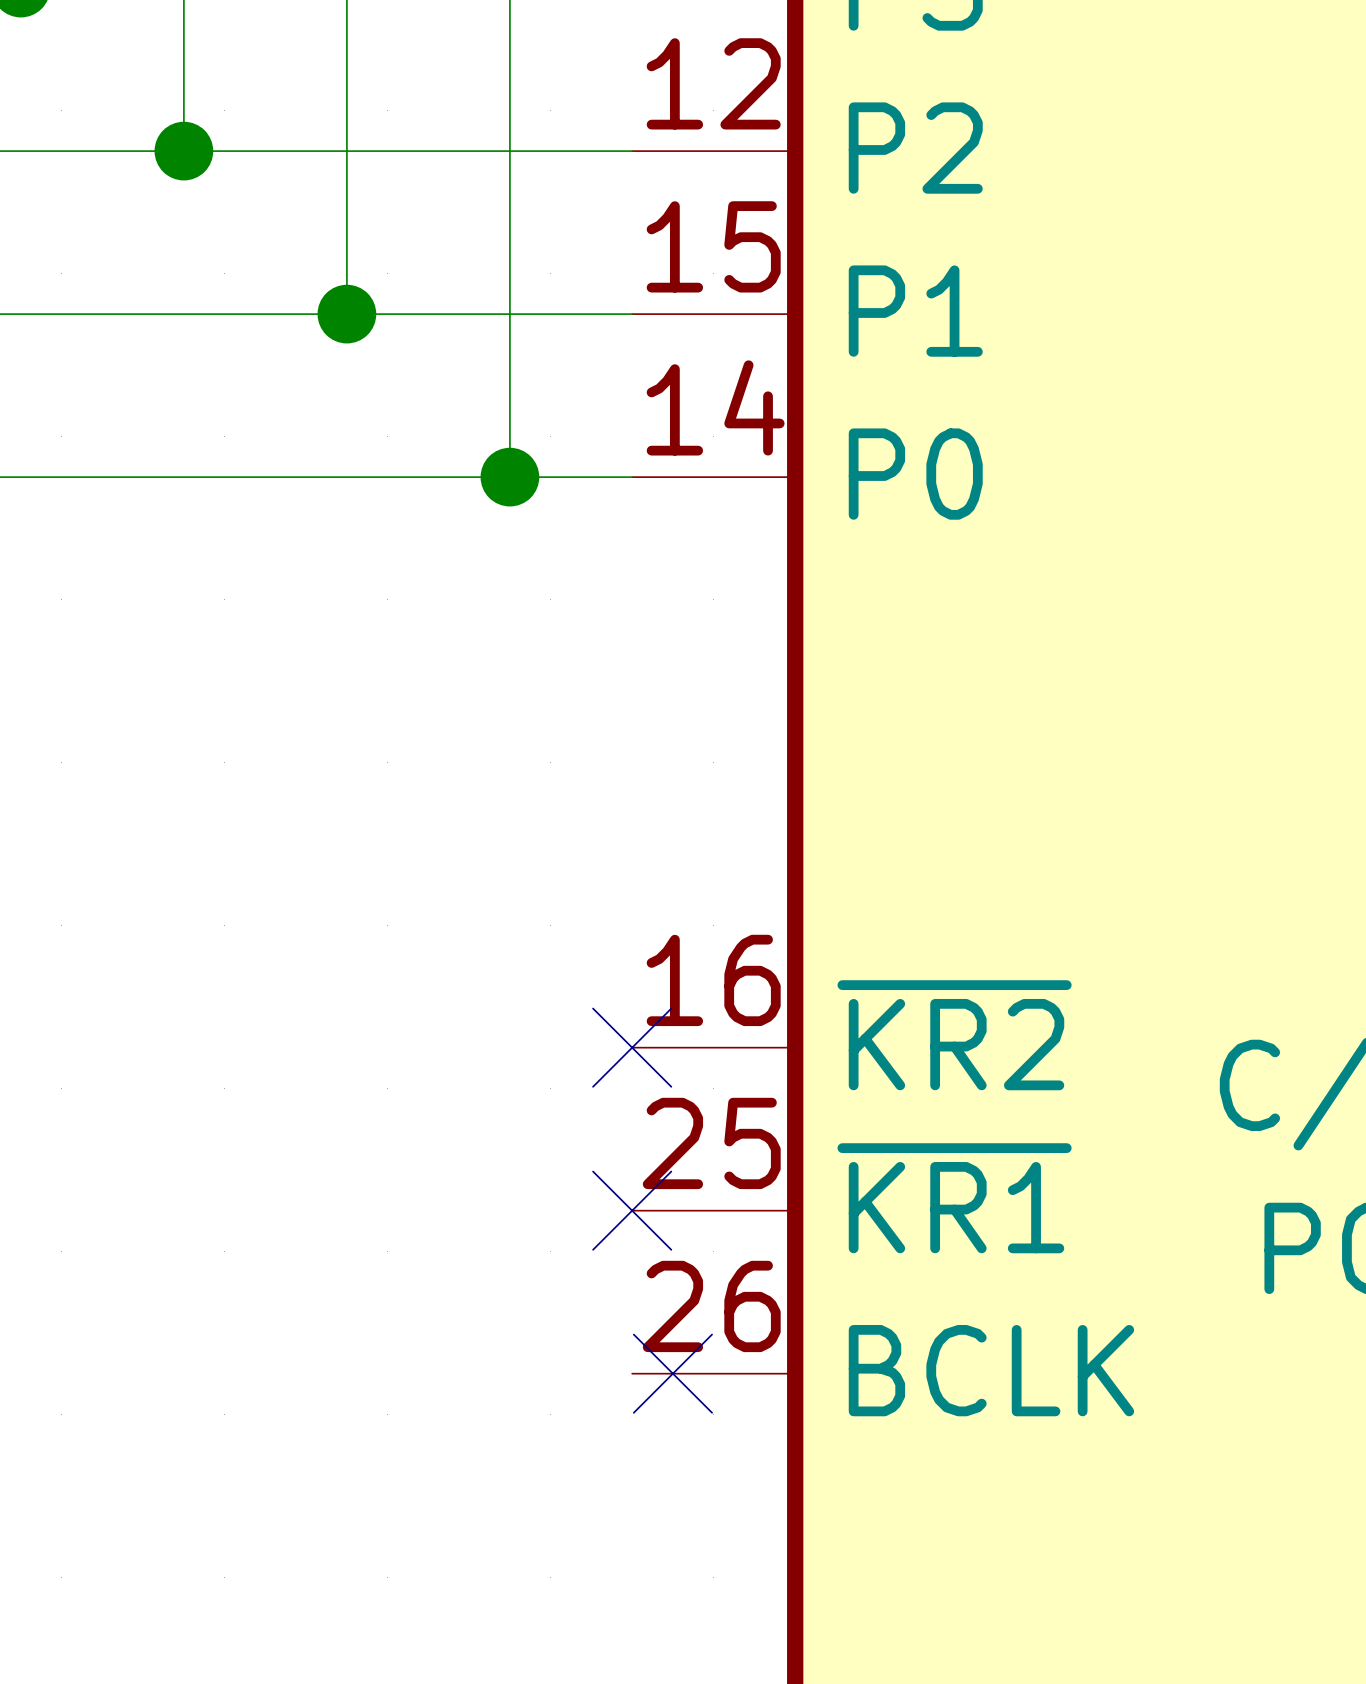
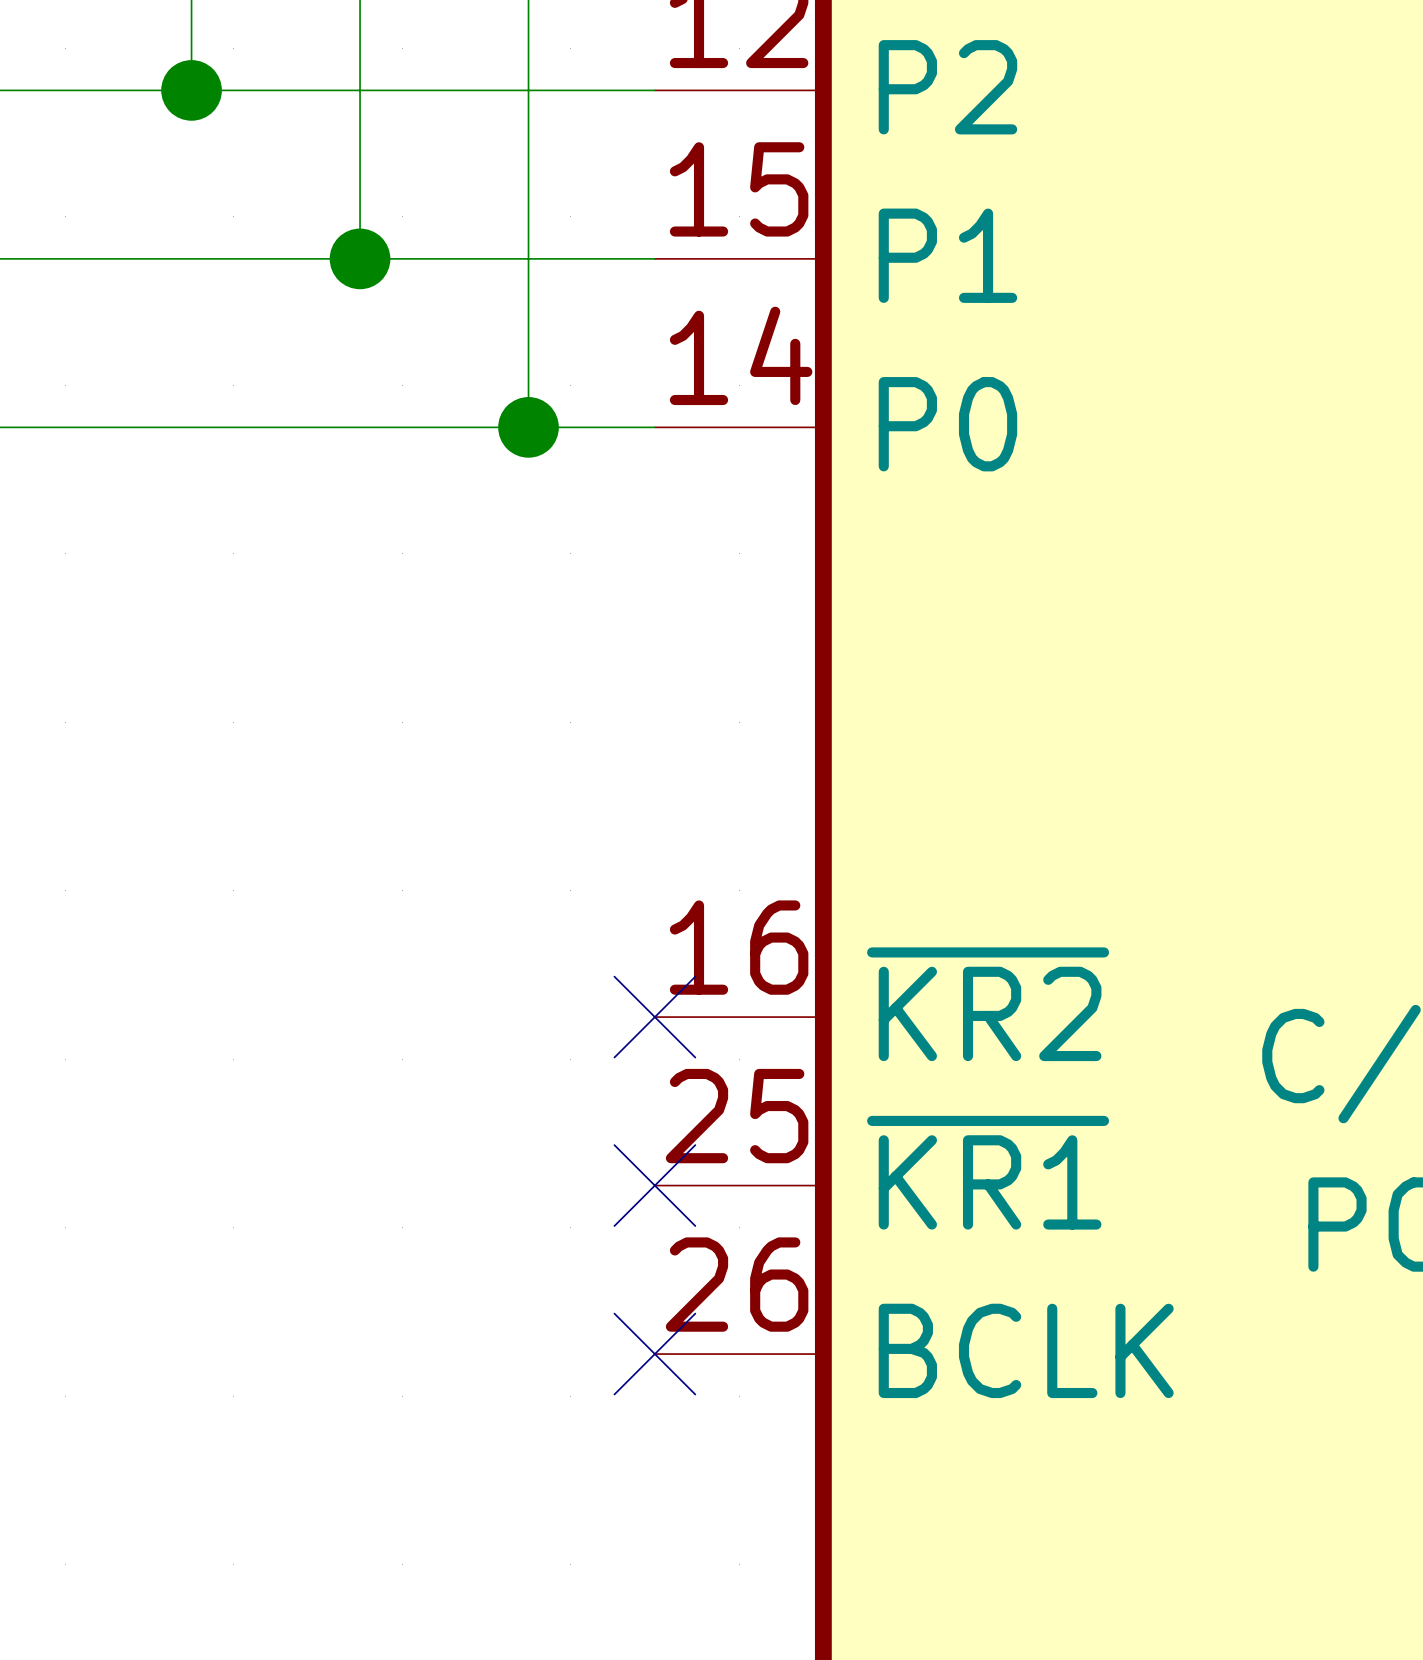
no-connect mark position: (672, 1373) -> (654, 1354)

